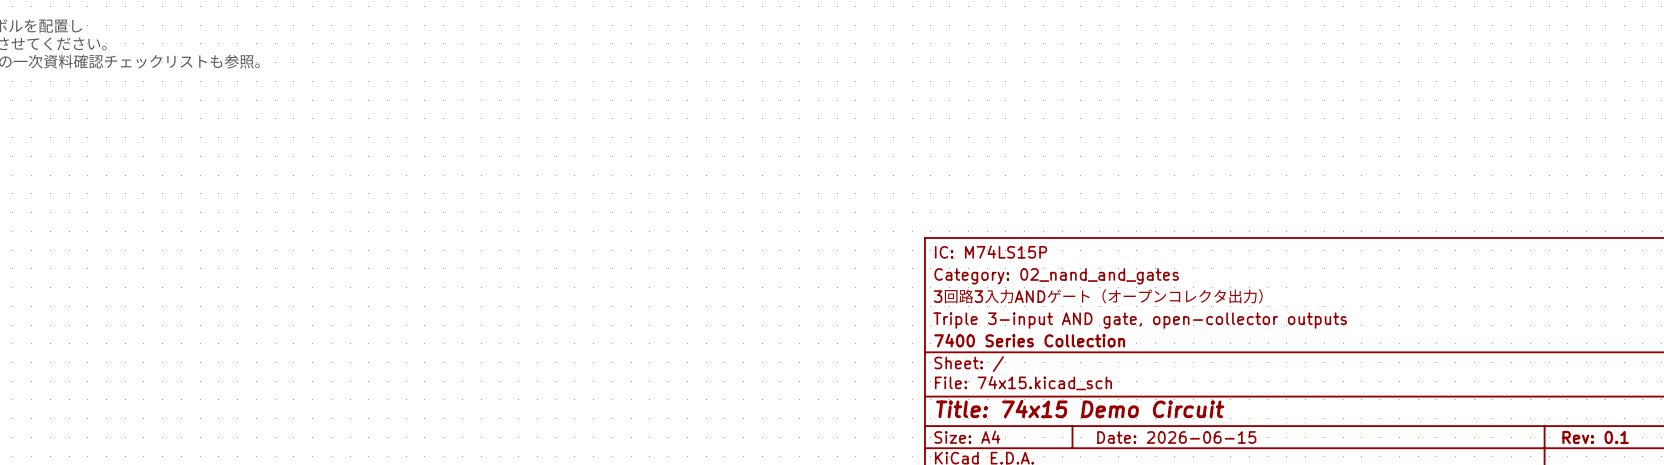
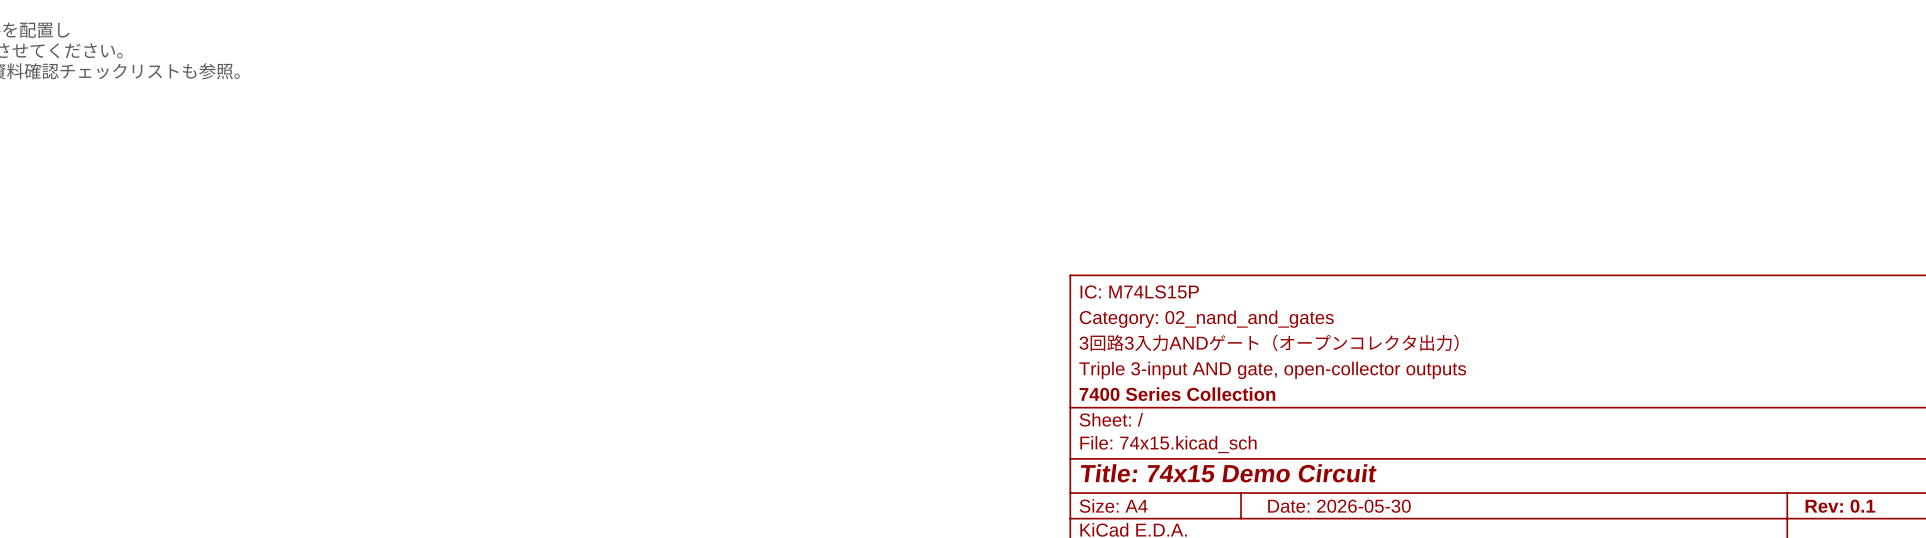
title block: Date: 2026-06-15 (1176, 437) -> Date: 2026-05-30 (1339, 506)

